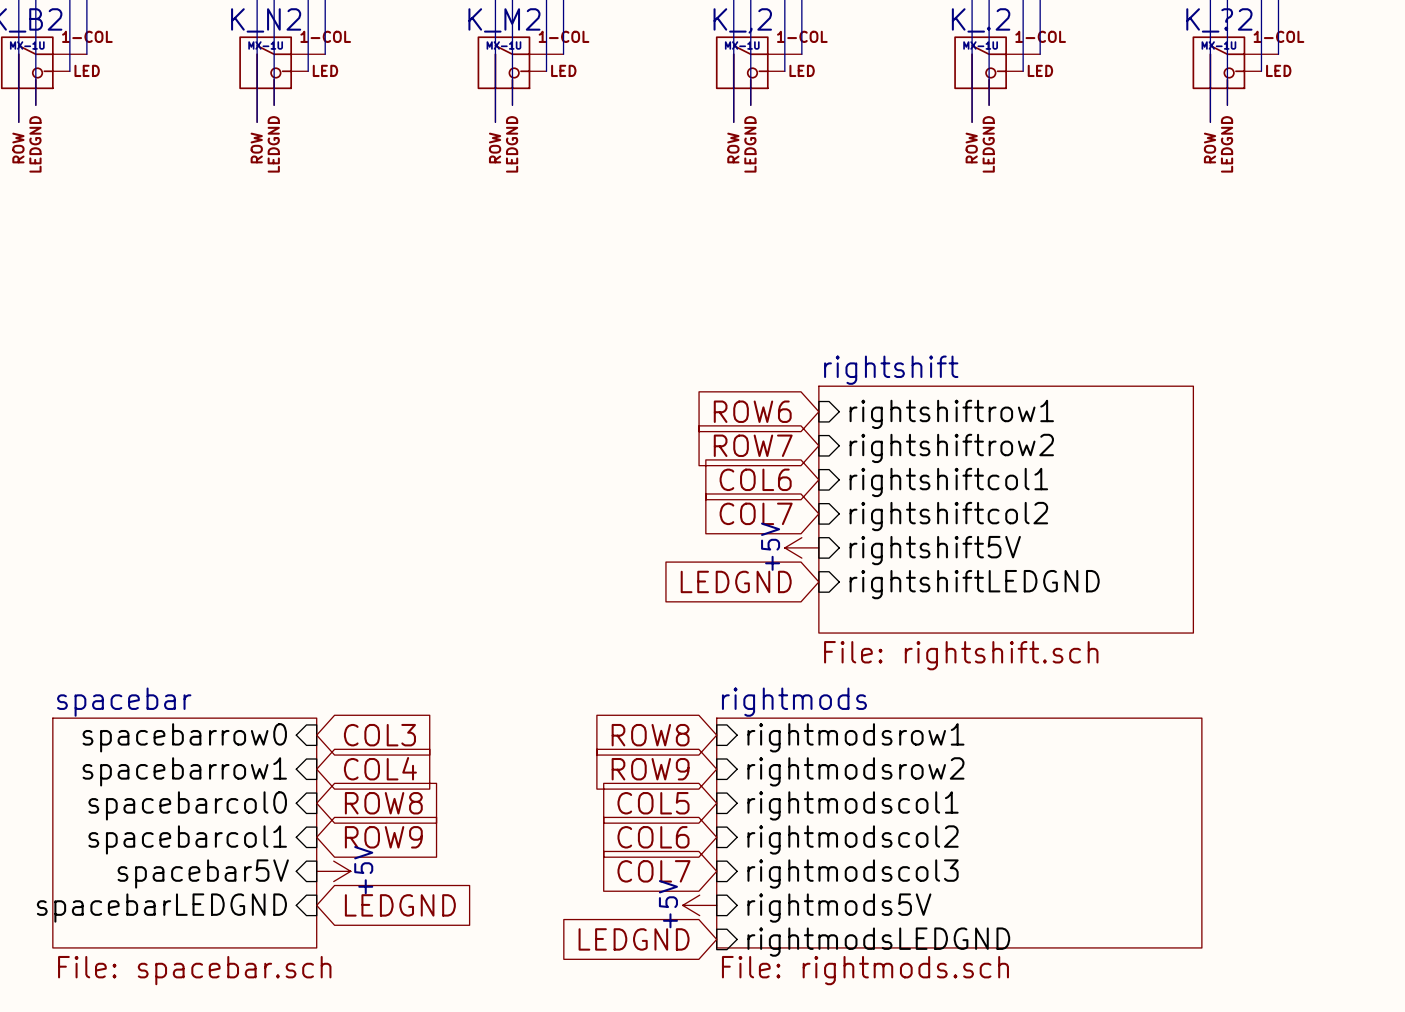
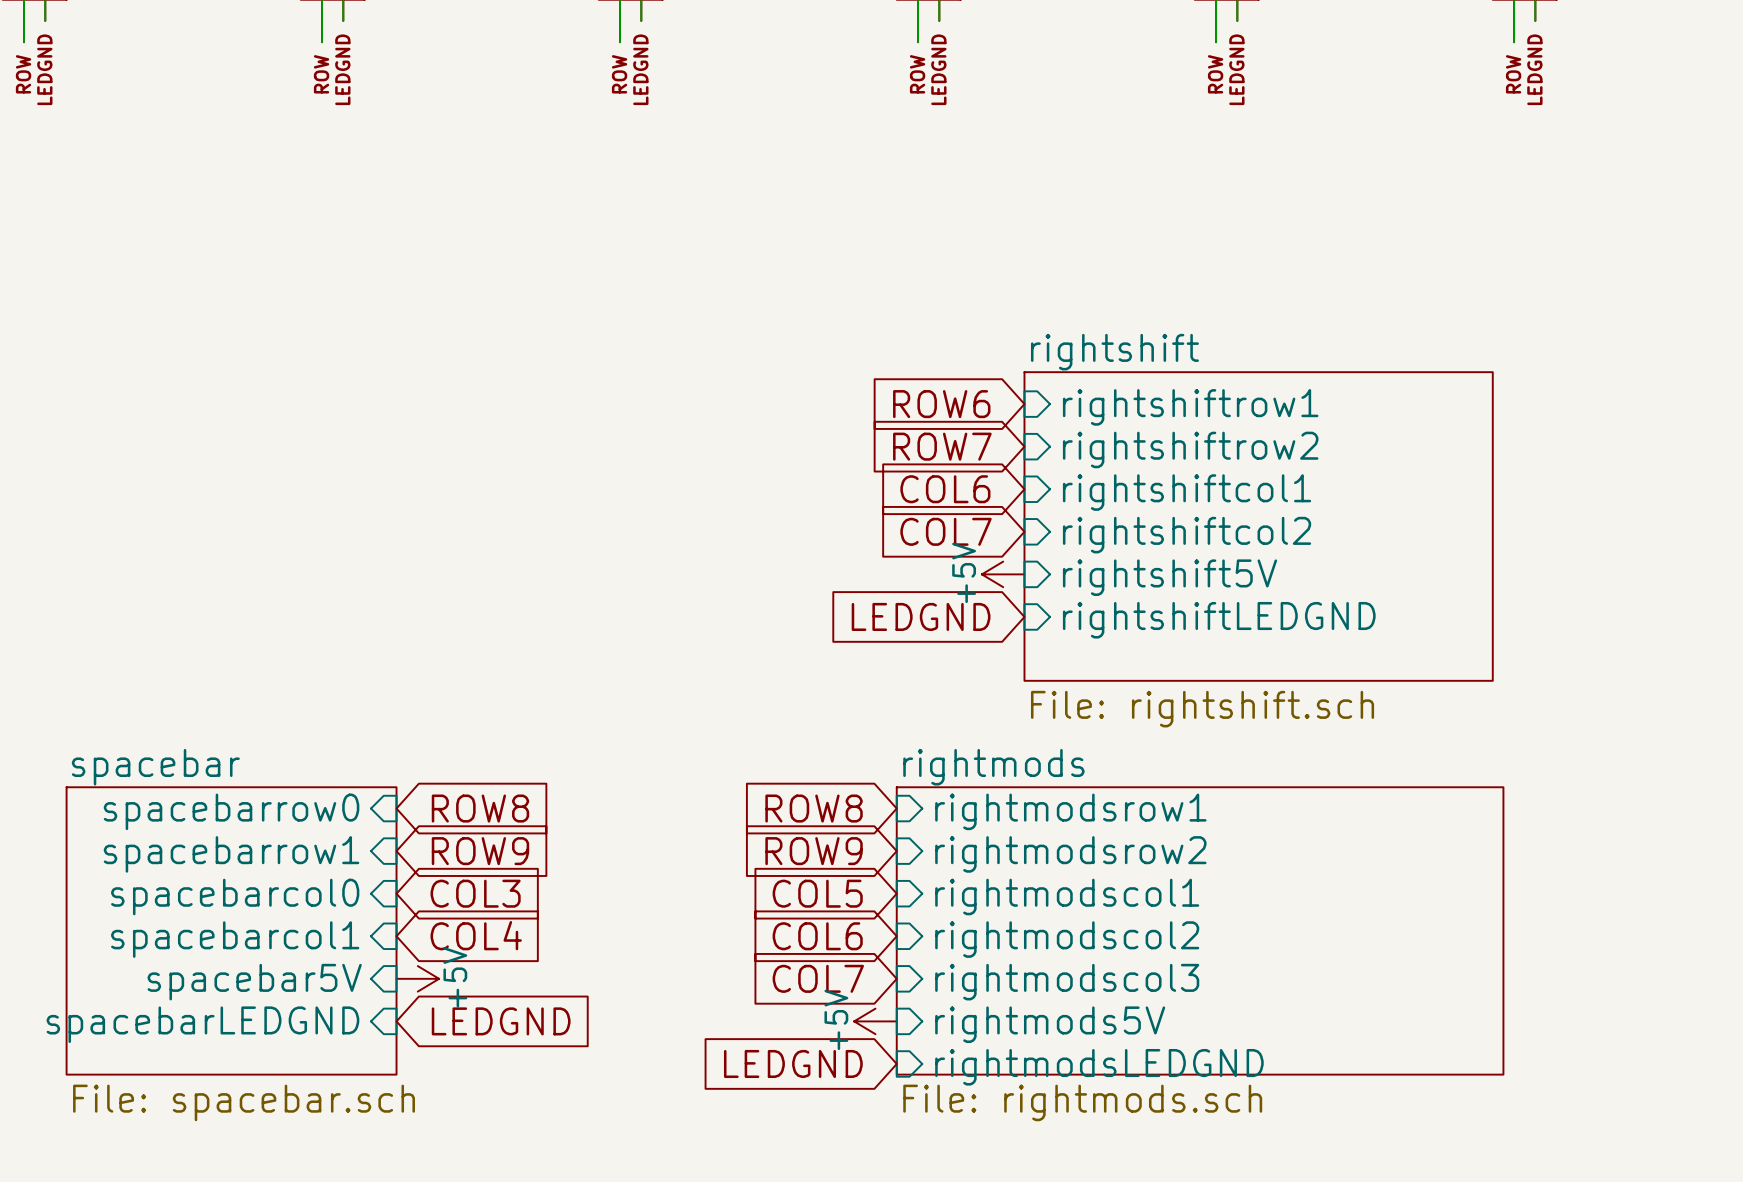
global label: COL3 (379, 735) -> ROW8 (480, 808)
global label: COL4 (380, 768) -> ROW9 (480, 851)
global label: ROW8 (383, 803) -> COL3 (475, 893)
global label: ROW9 (383, 837) -> COL4 (476, 935)

